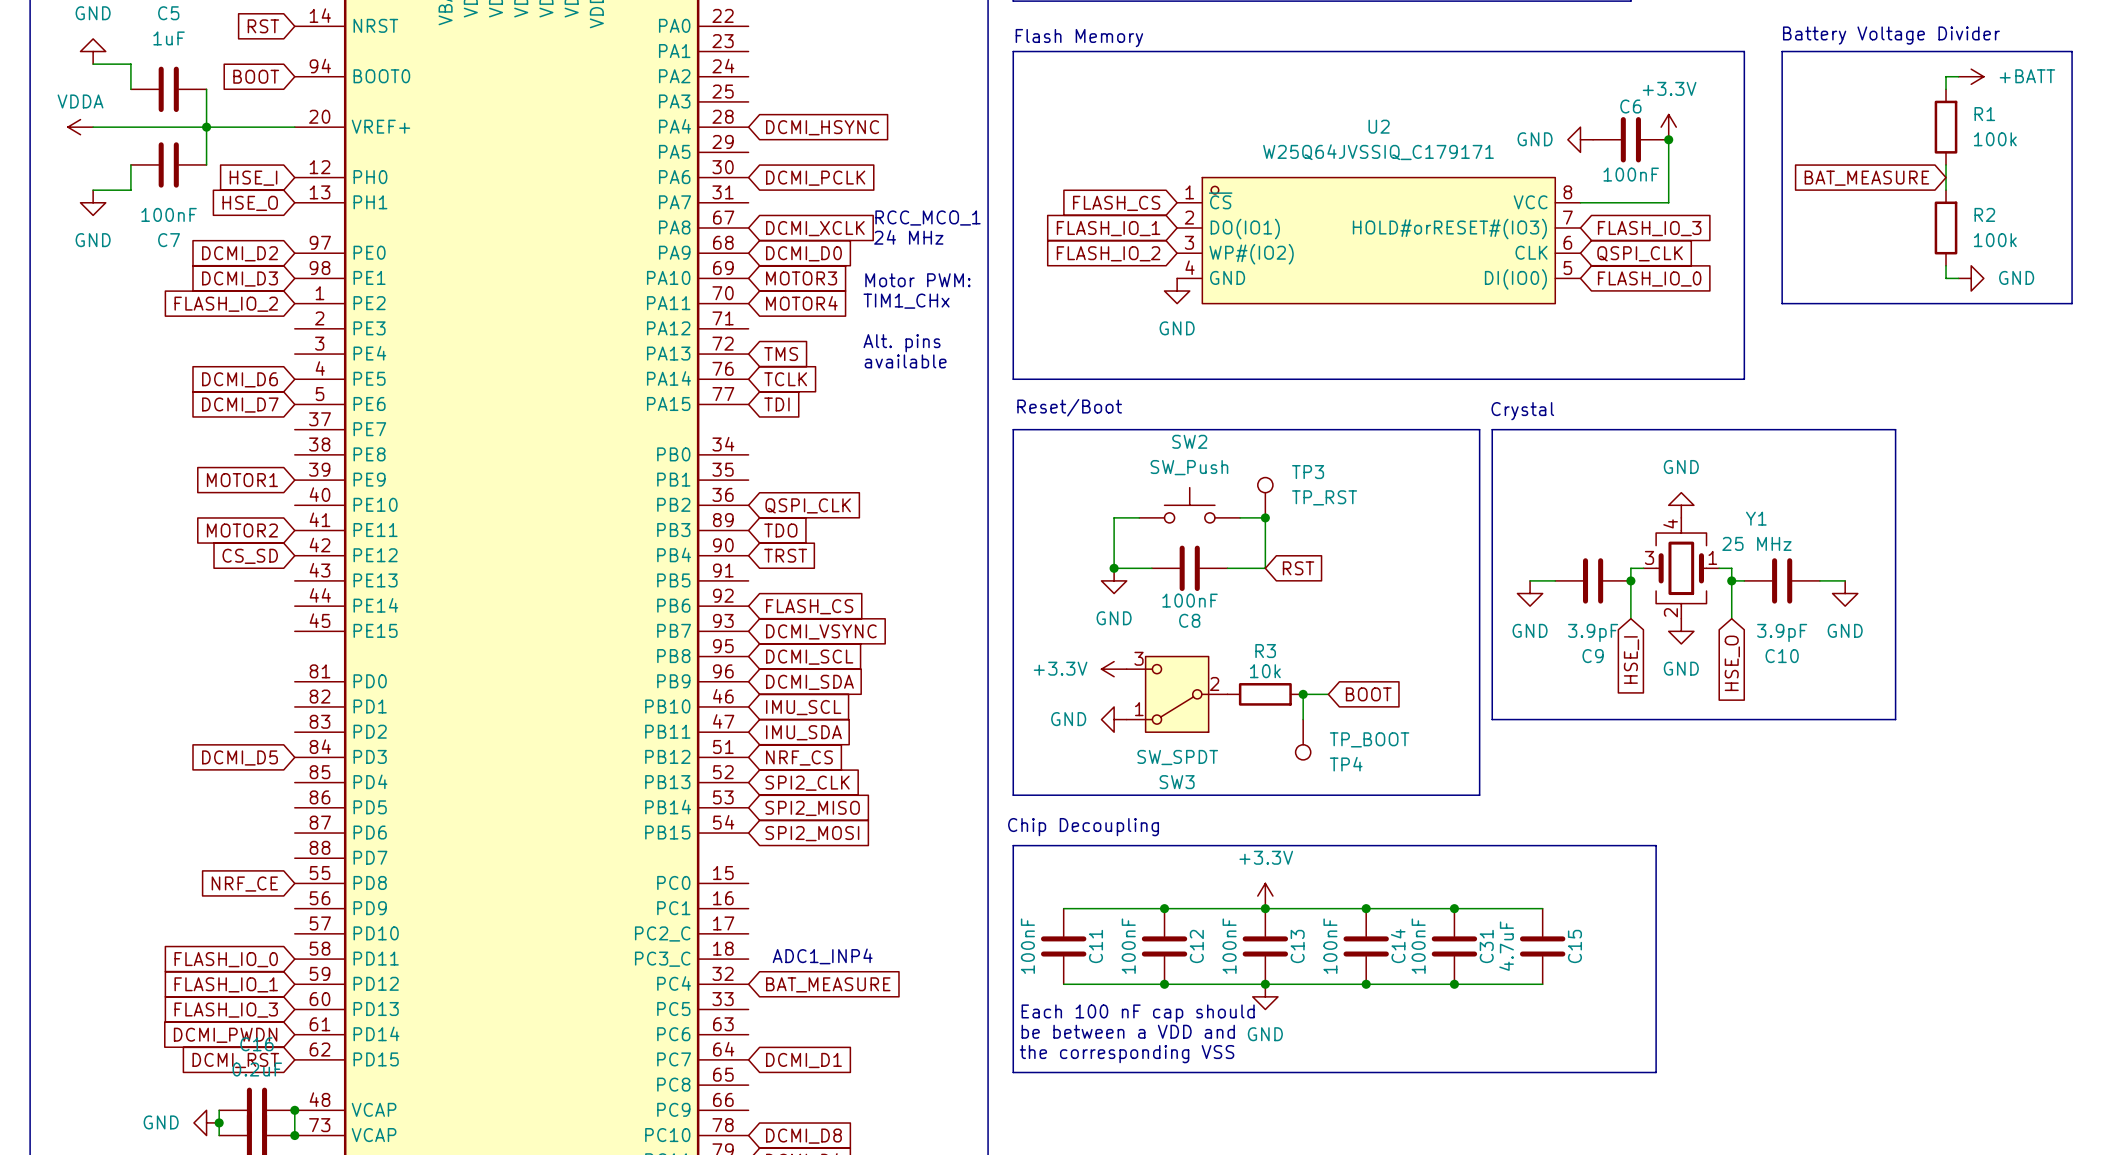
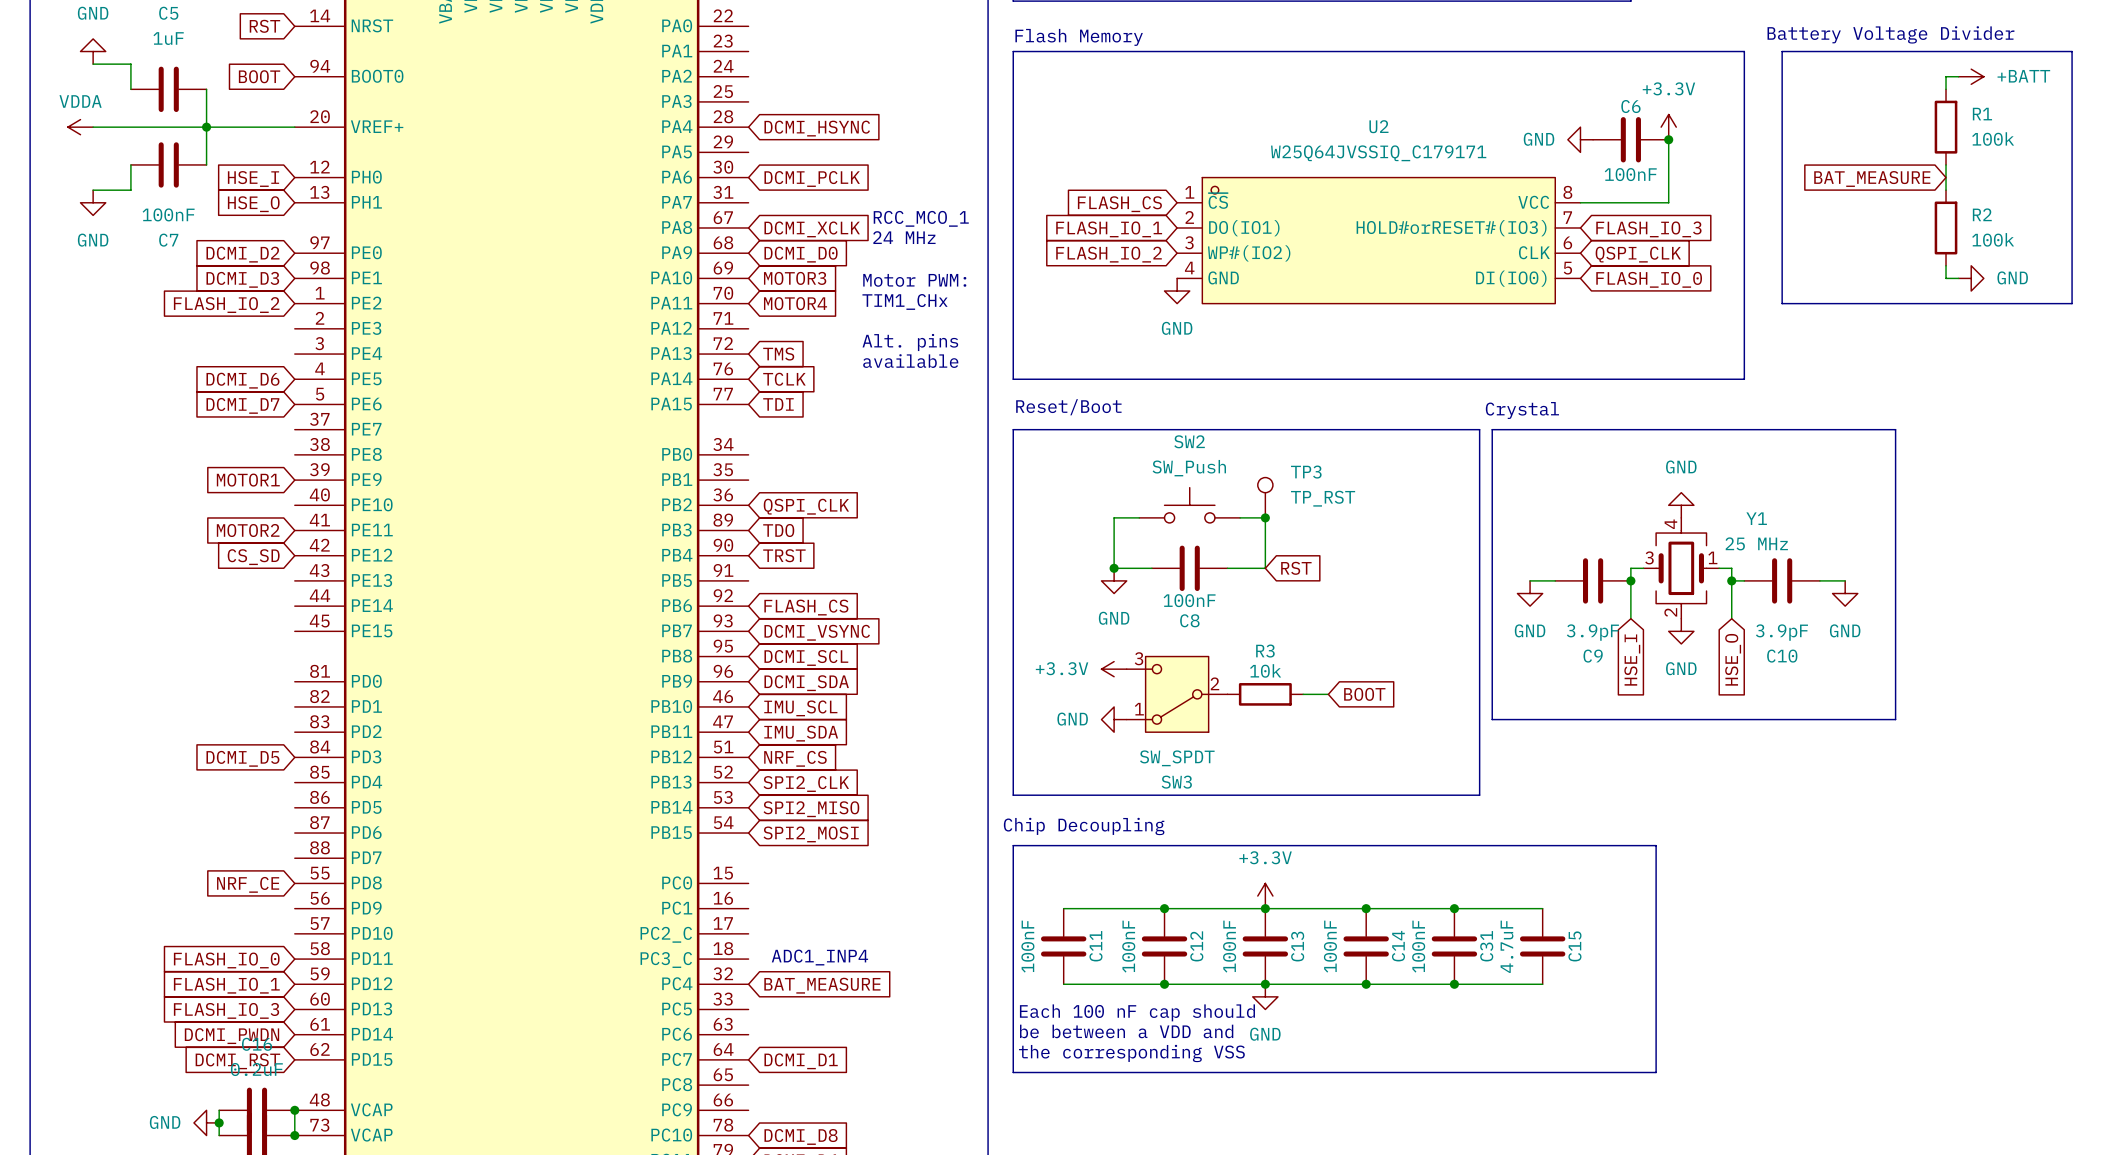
wire: (1303, 694) (1303, 719) -> none
junction: (1303, 694) -> none
TP4: TP_BOOT (1303, 739) -> none

